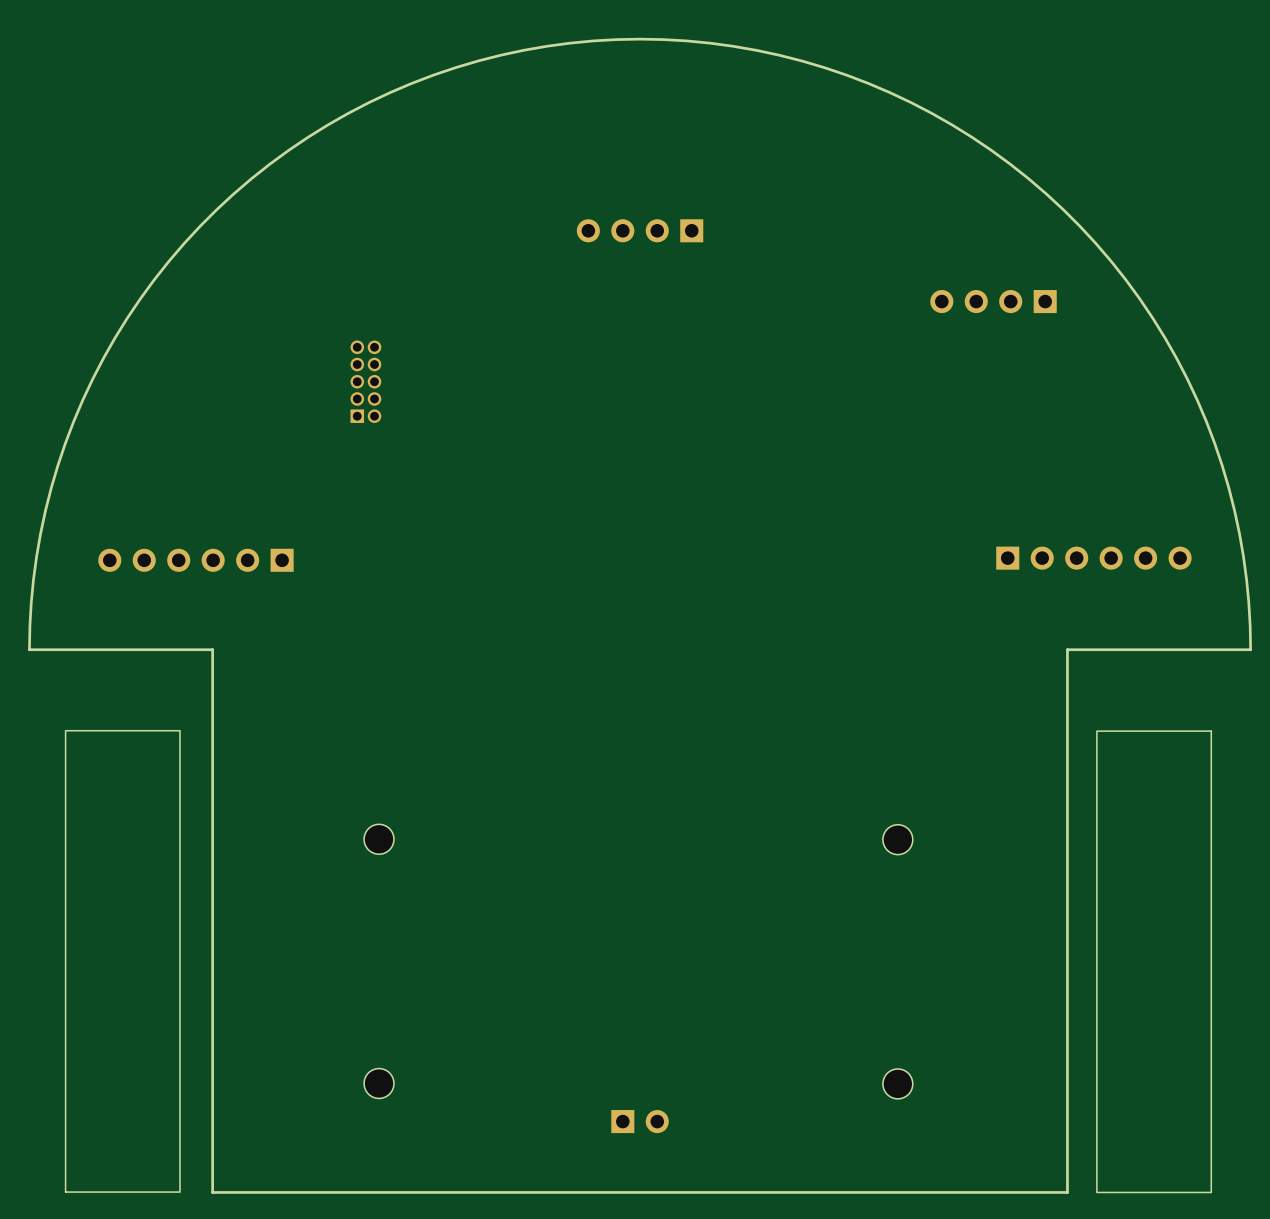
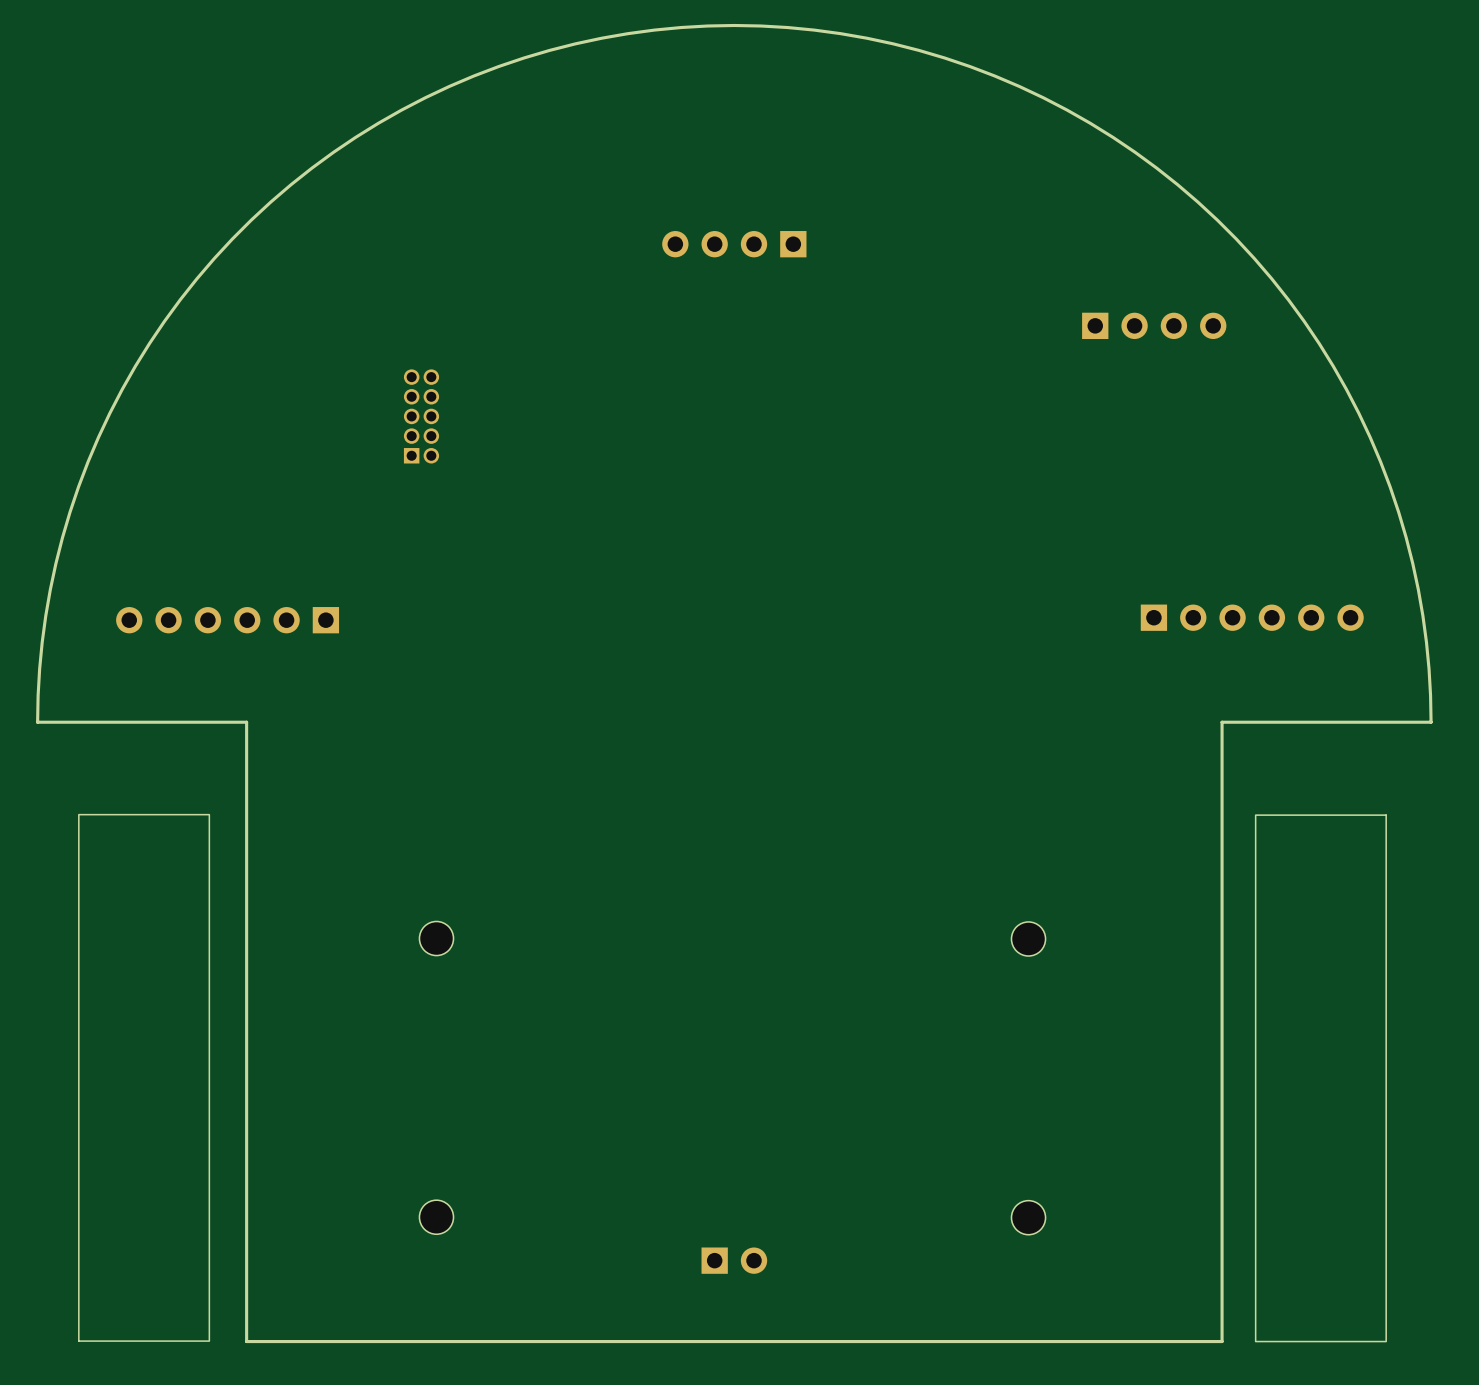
part rotation: 0° (993, 301) -> 180° (1154, 325)

